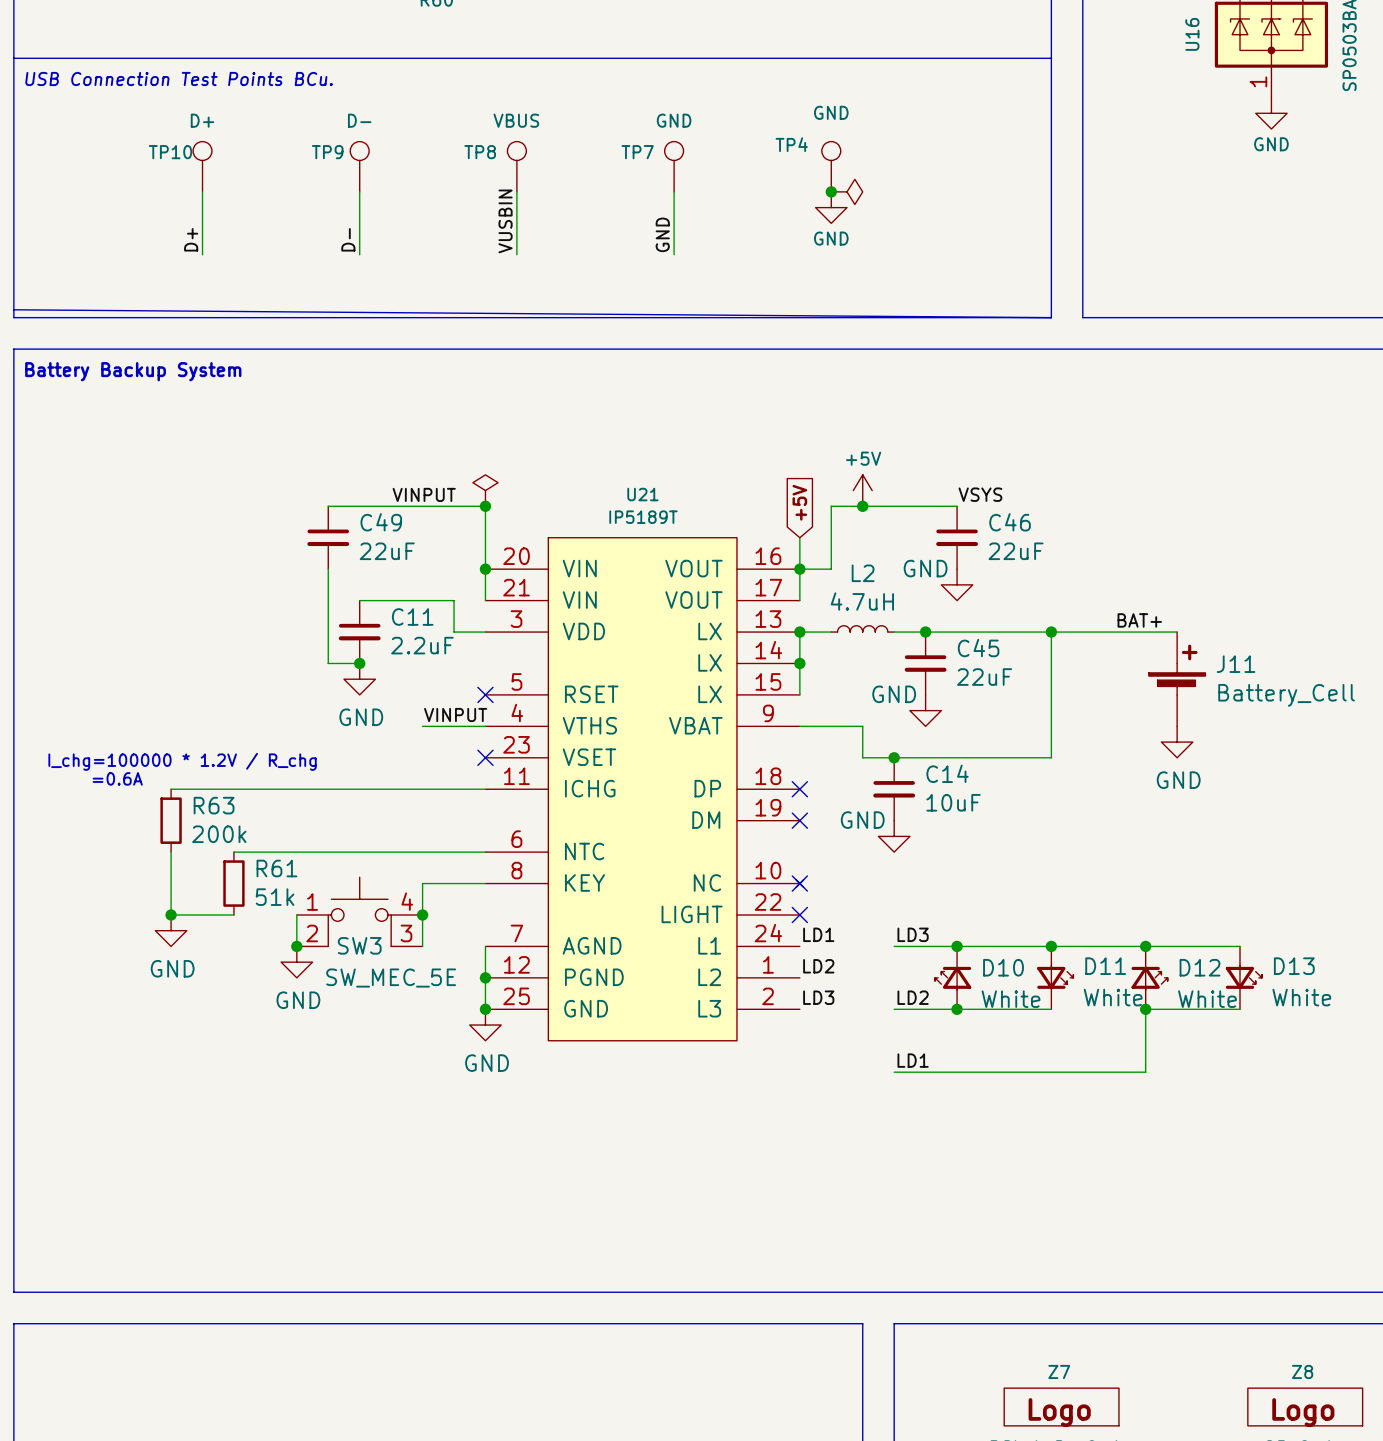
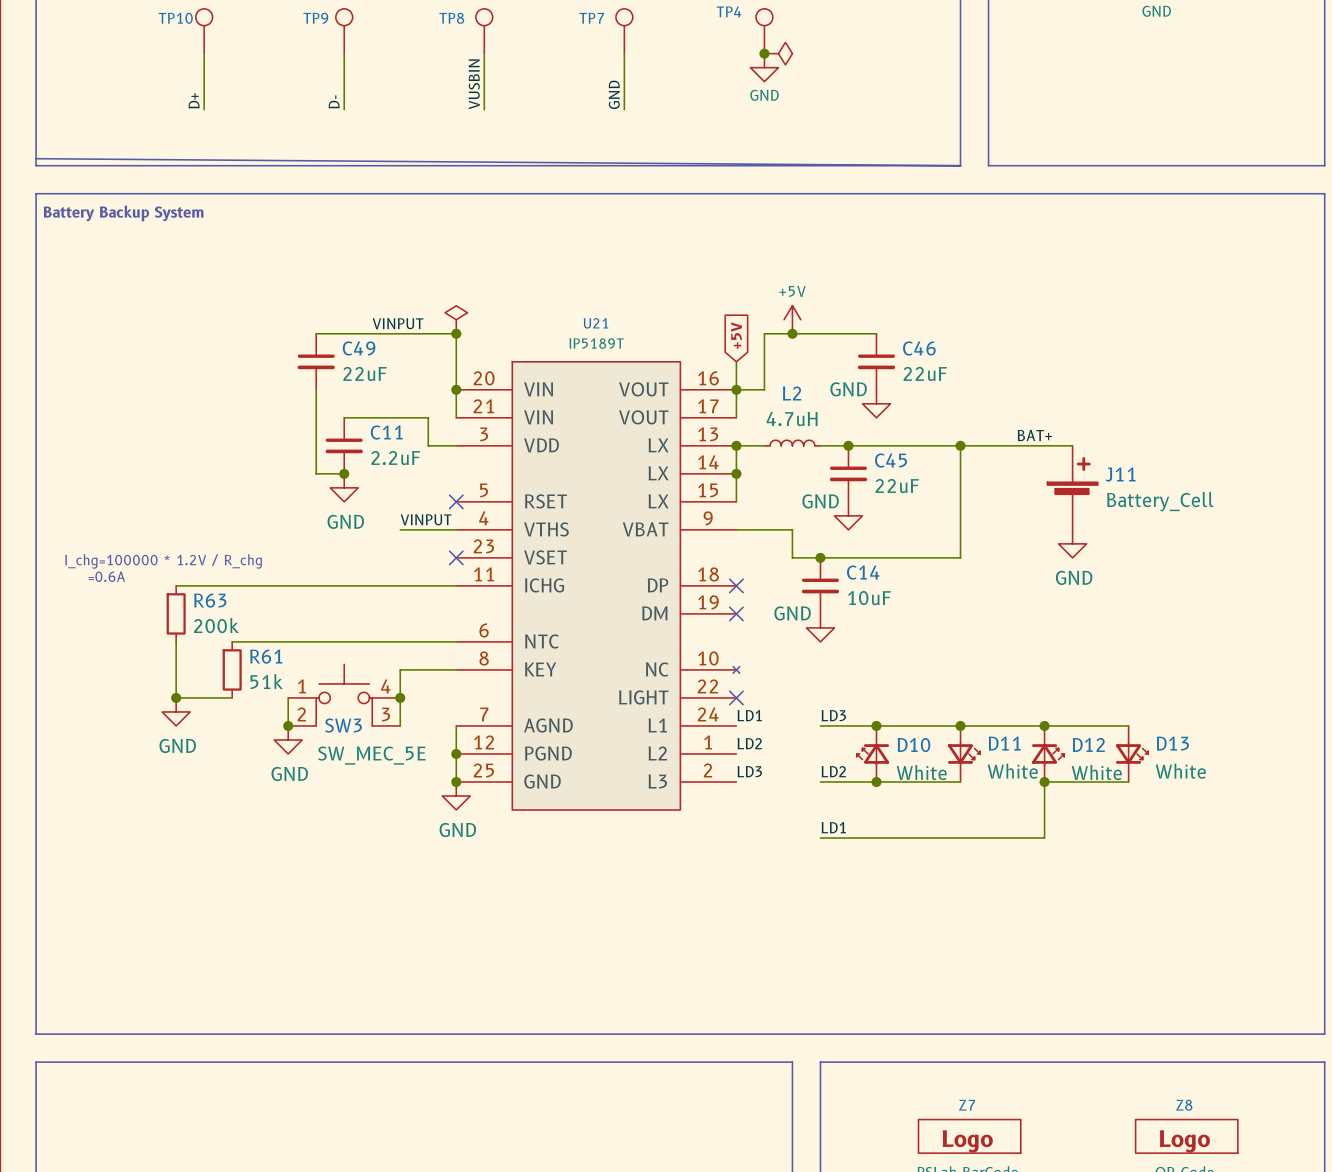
label: VSYS (980, 494) -> none
no-connect mark: (799, 883) -> none

